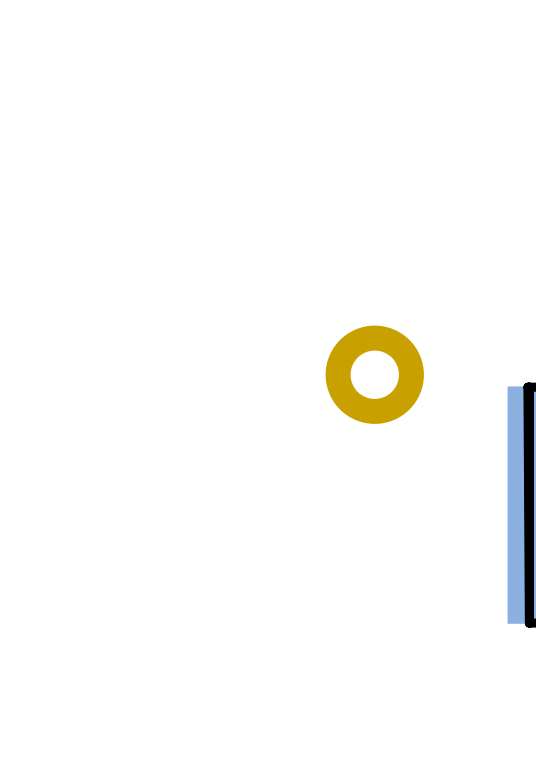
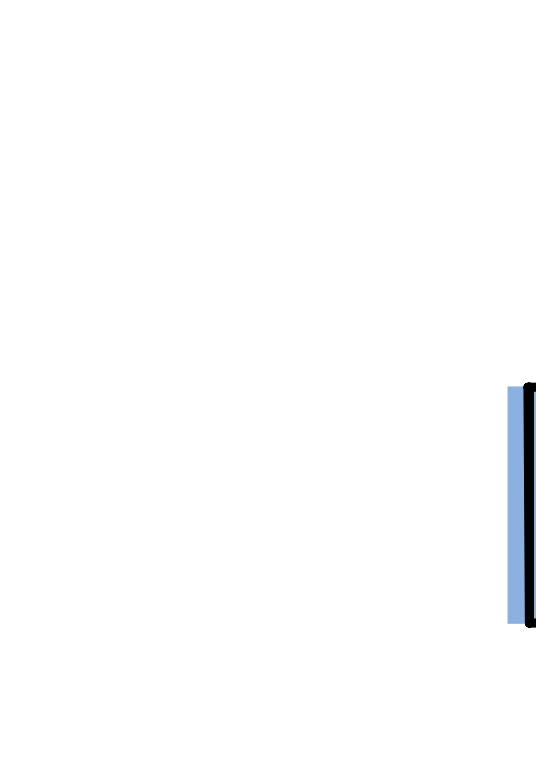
part: (374, 374) -> none

